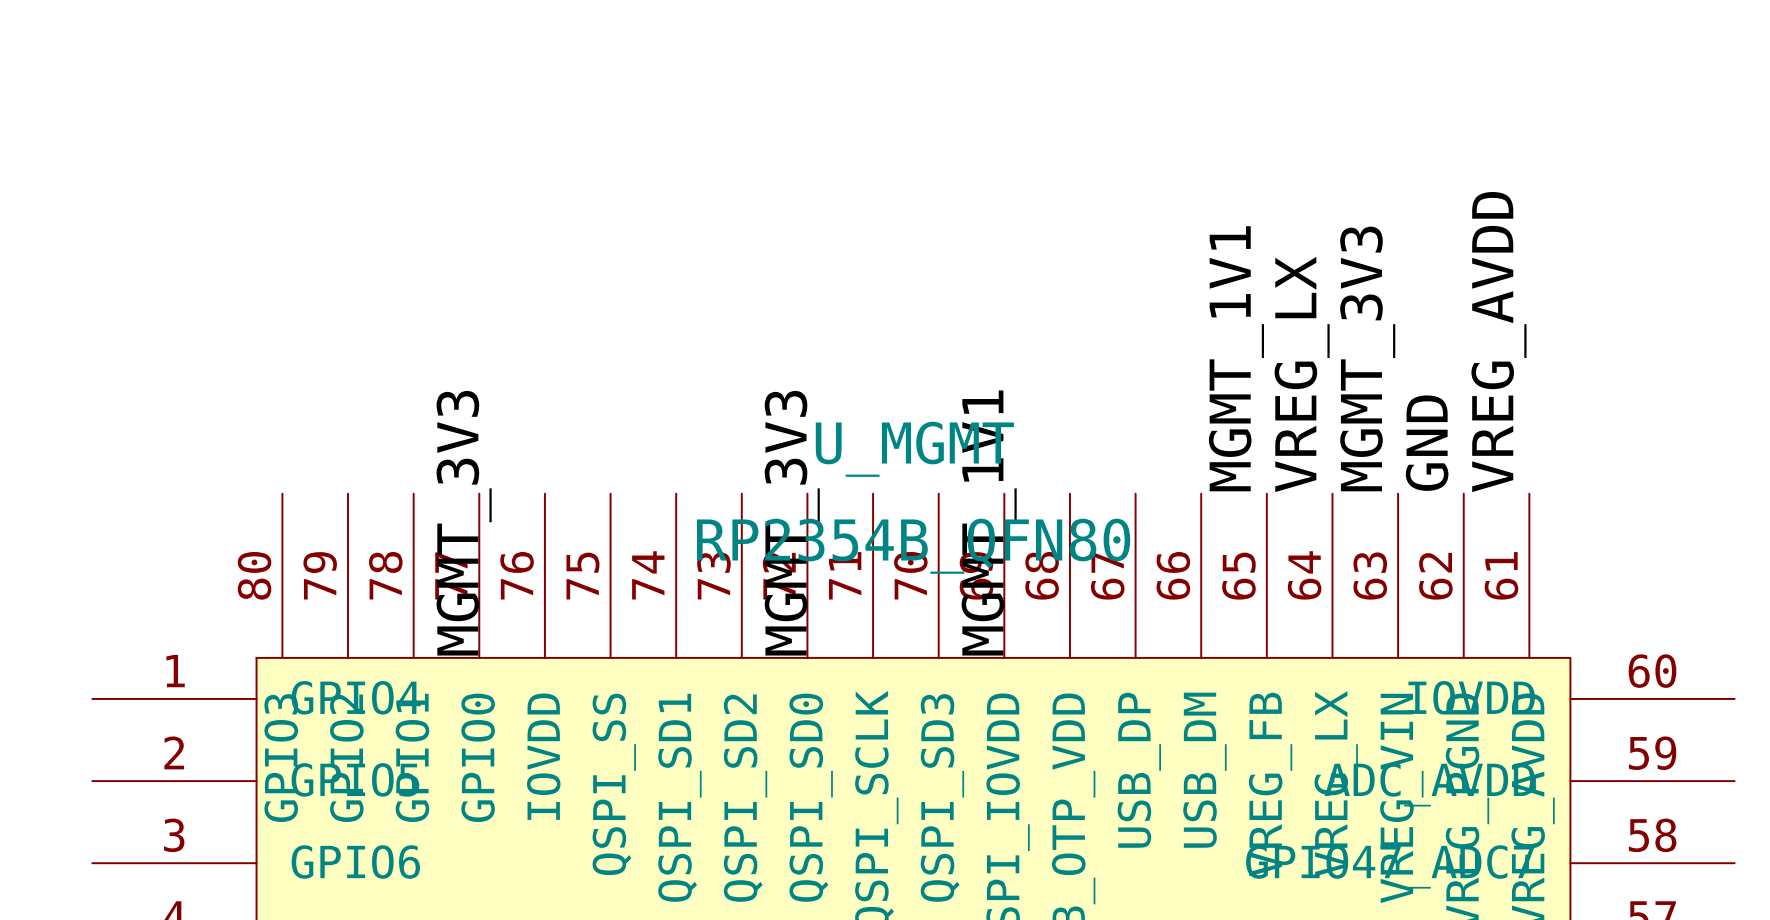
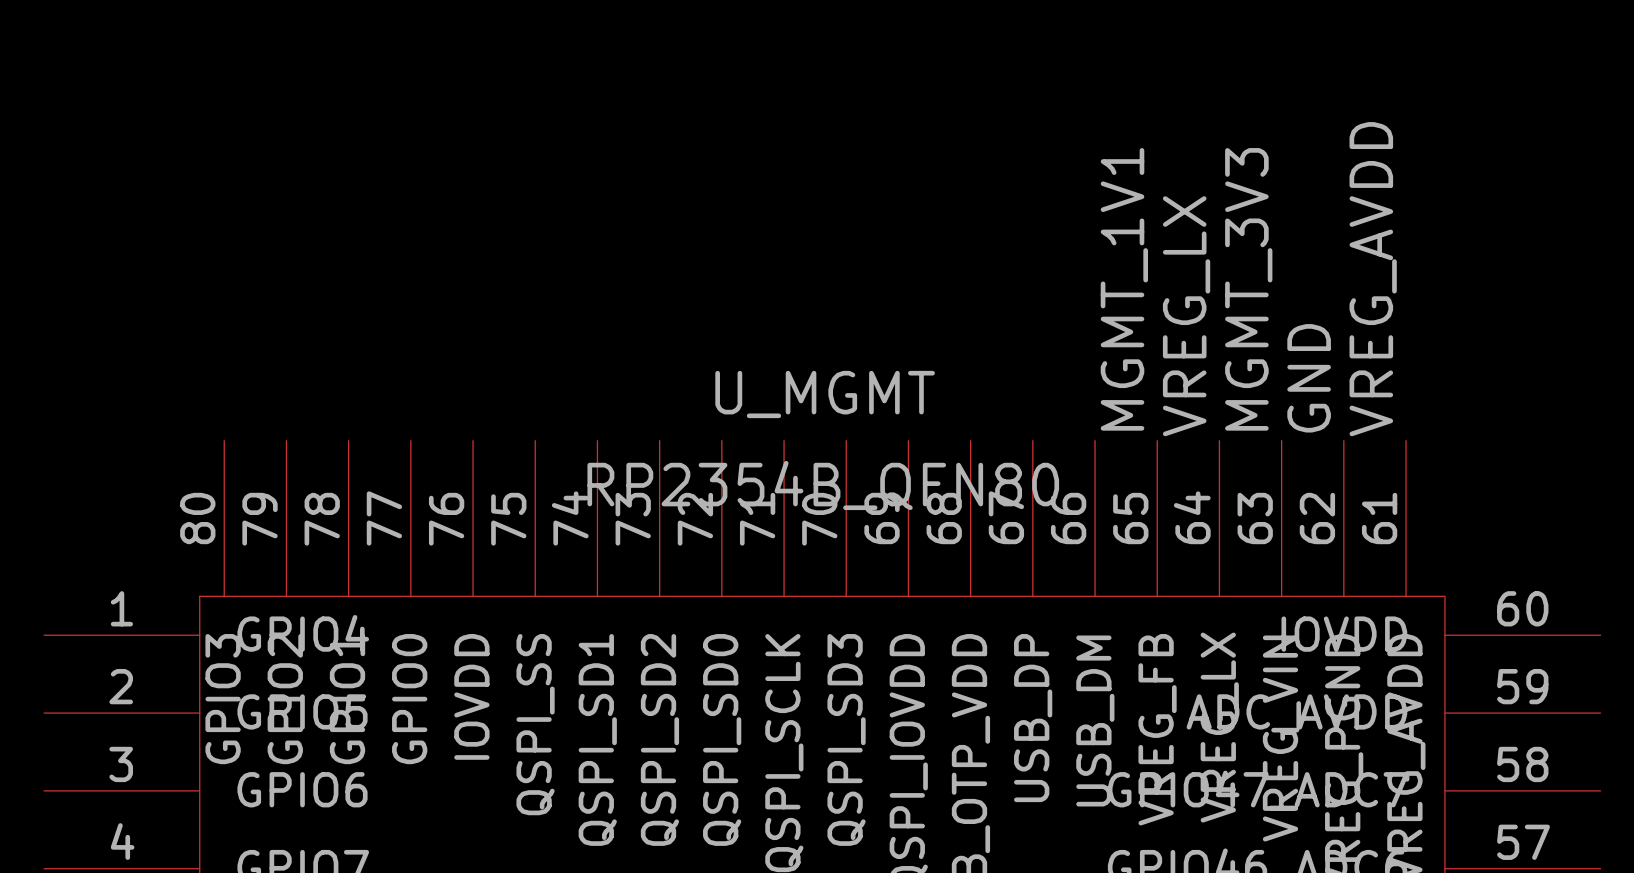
label: MGMT_3V3 (464, 523) -> none
label: MGMT_3V3 (792, 523) -> none
label: MGMT_1V1 (989, 523) -> none

